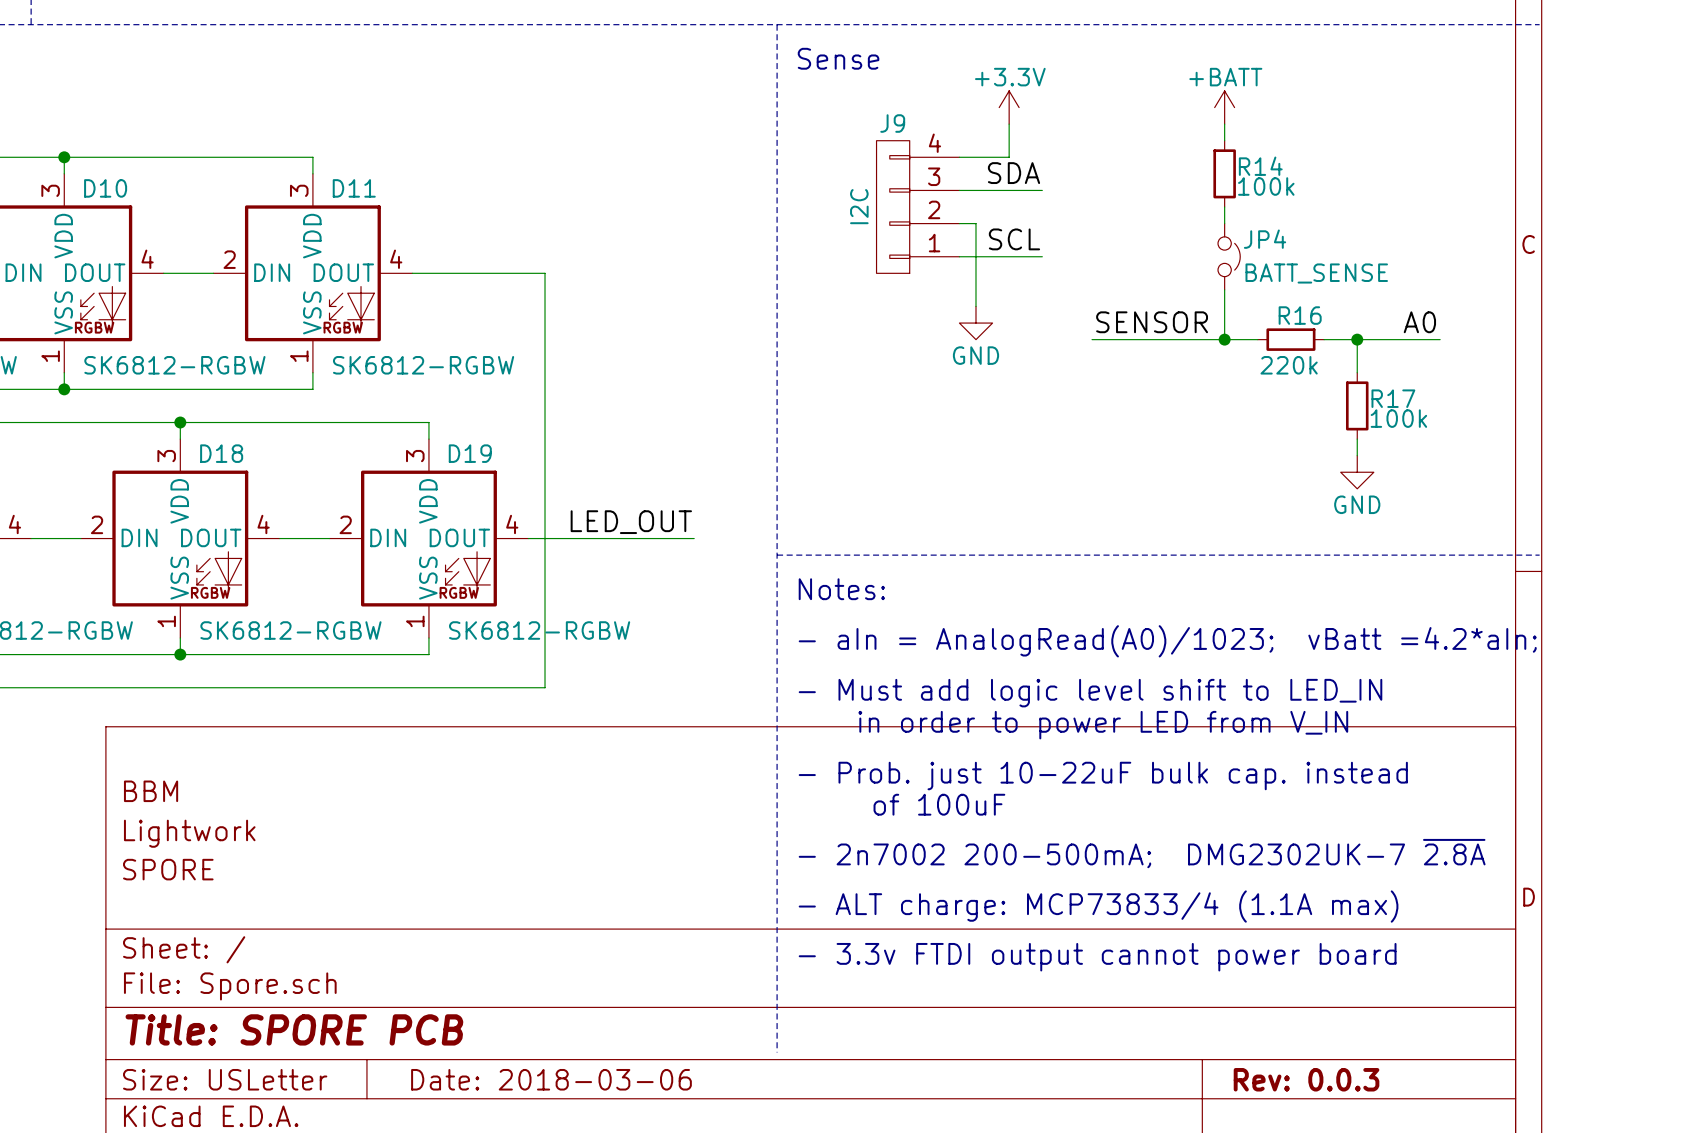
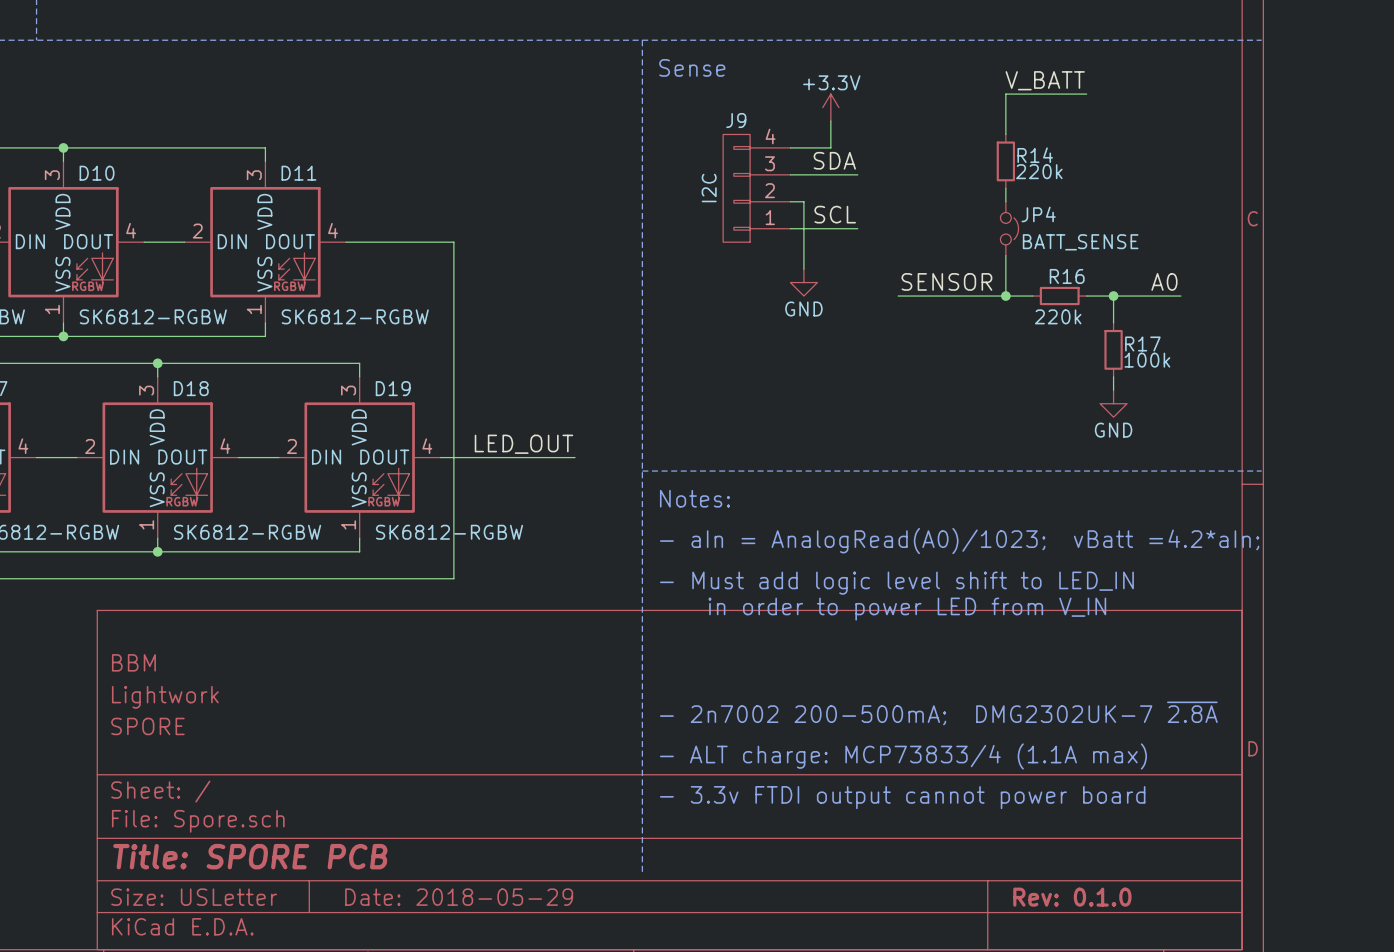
label: none -> V_BATT (1045, 80)
wire: none -> (1086, 94) (1005, 94) (1005, 121)
power symbol: +BATT (1224, 107) -> none
R14 value: 100k (1266, 186) -> 220k (1039, 171)
text: - Prob. just 10-22uF bulk cap. instead (1103, 776) -> none
text: of 100uF (939, 804) -> none
title block: Date: 2018-03-06 (551, 1079) -> Date: 2018-05-29 (459, 897)
title block: Rev: 0.0.3 (1306, 1079) -> Rev: 0.1.0 (1072, 897)

